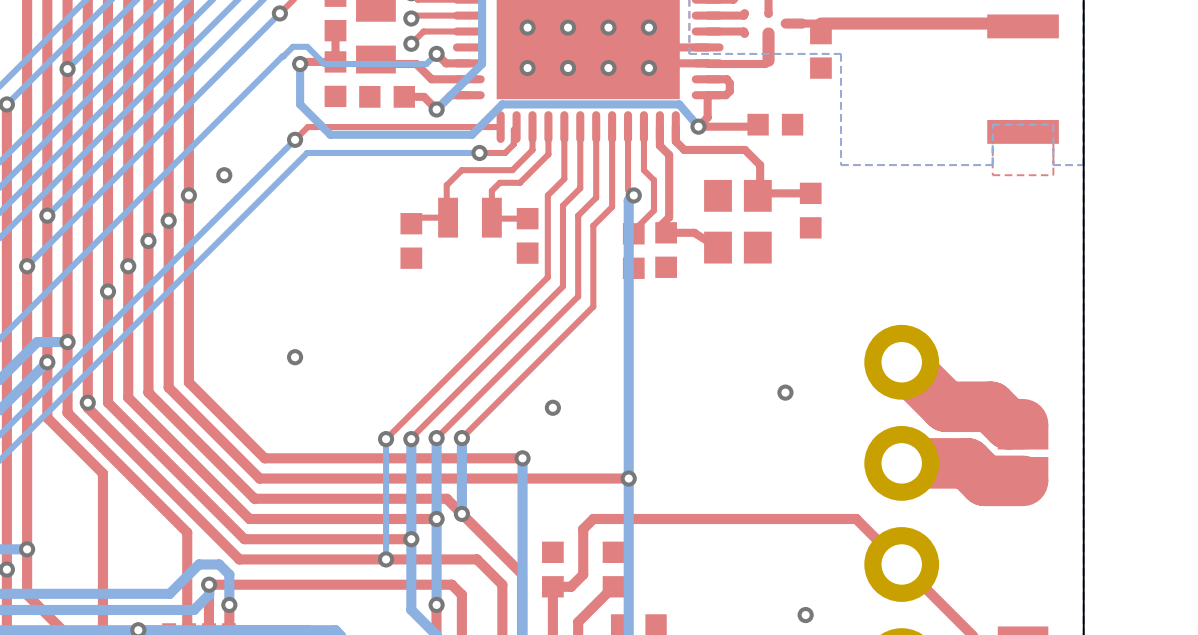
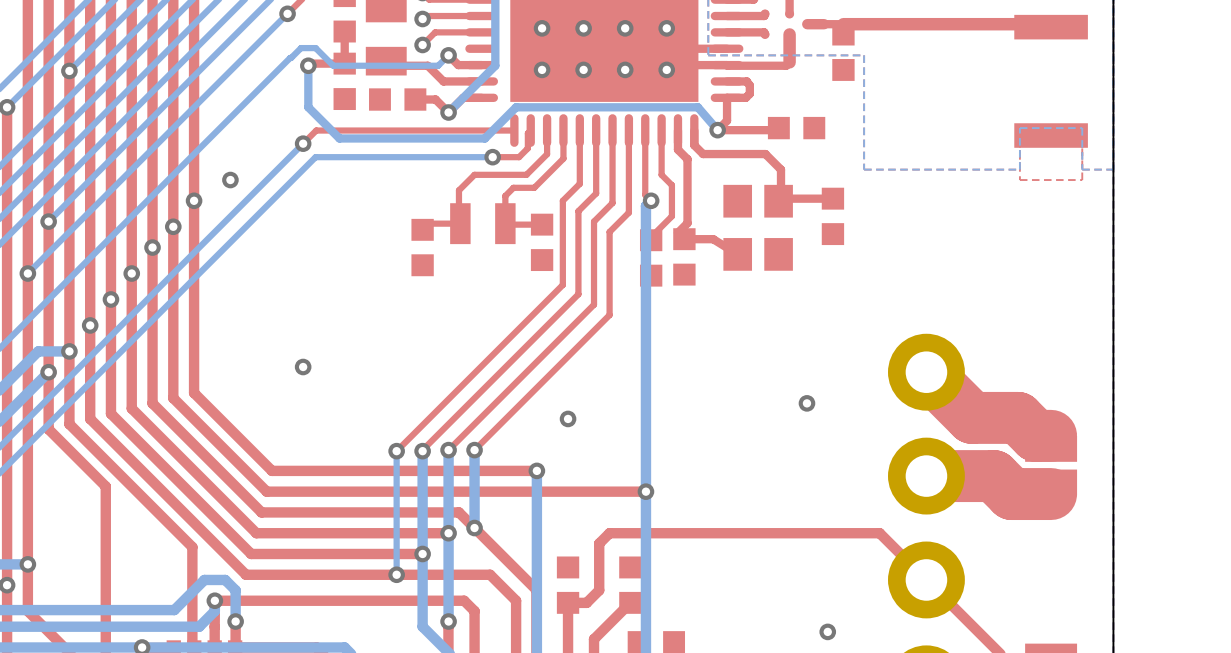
via position: (87, 402) -> (90, 325)

